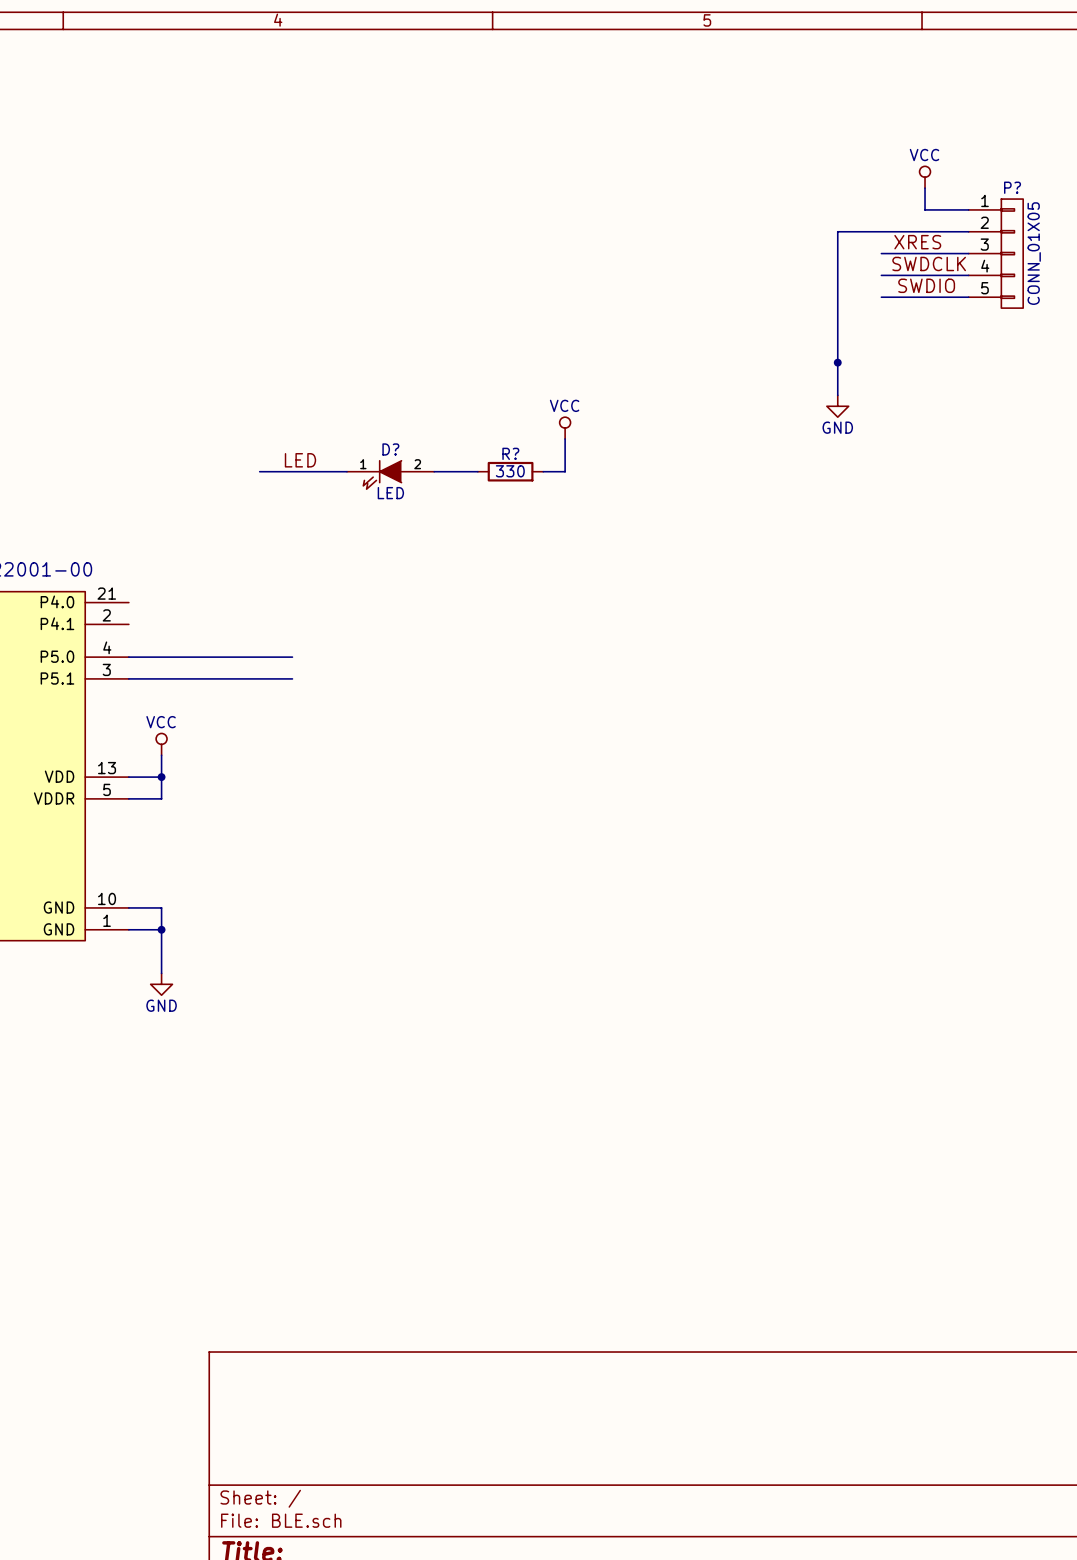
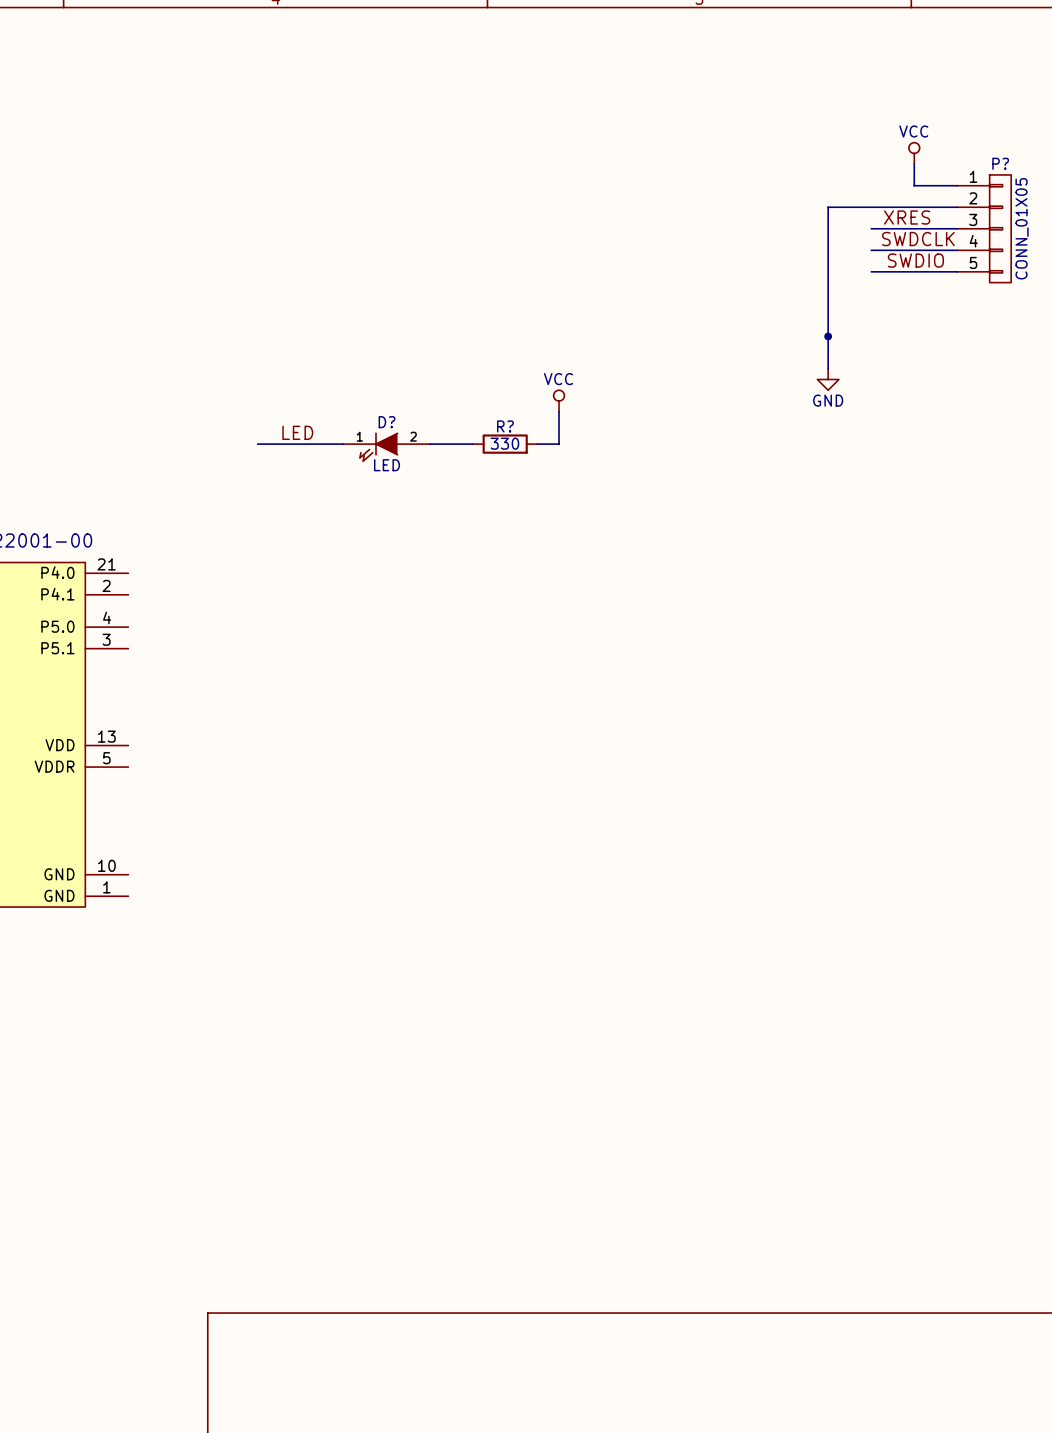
wire: (128, 657) (292, 657) -> none
wire: (128, 678) (292, 678) -> none
power symbol: VCC (161, 744) -> none
wire: (161, 755) (161, 798) (128, 798) -> none
wire: (128, 777) (161, 777) -> none
junction: (161, 777) -> none
wire: (128, 907) (161, 907) (161, 973) -> none
wire: (128, 929) (161, 929) -> none
junction: (161, 929) -> none
power symbol: GND (161, 984) -> none

